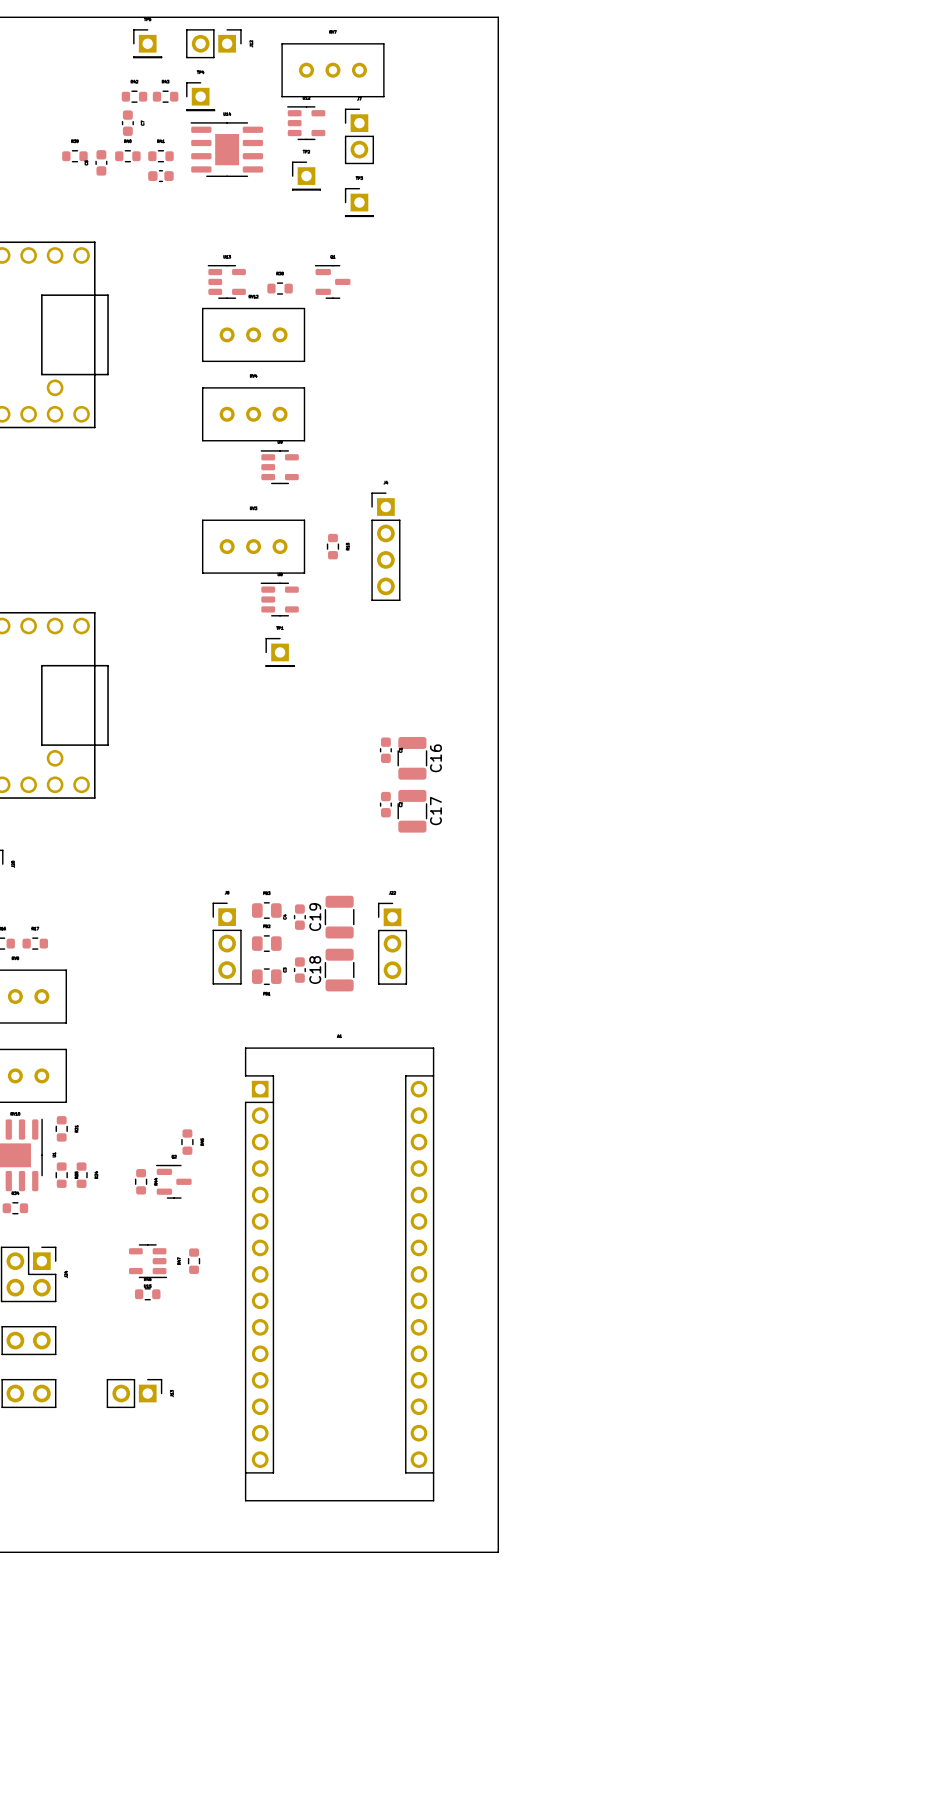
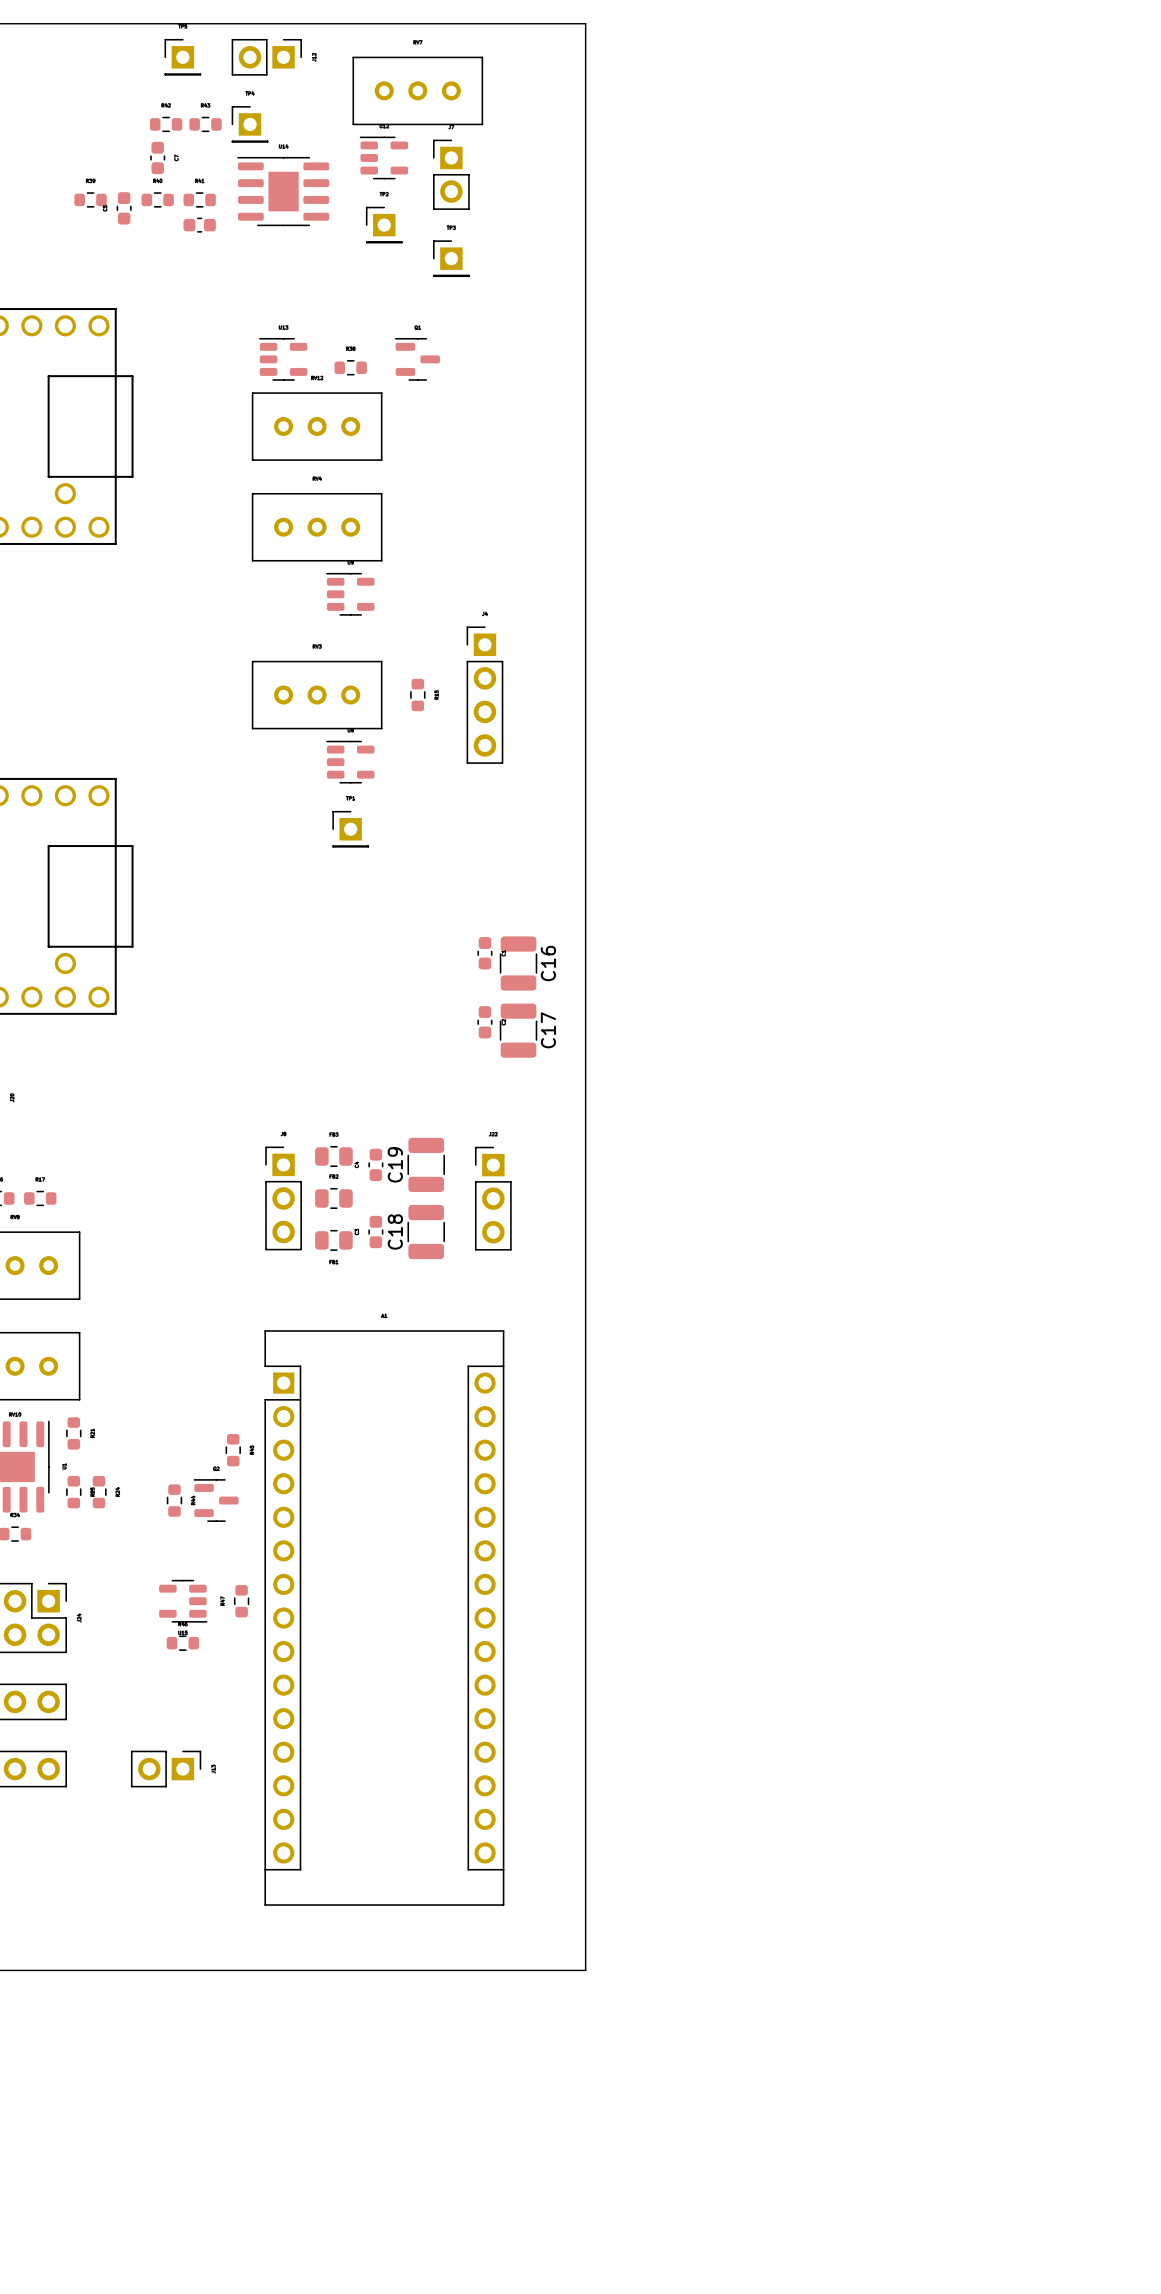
board edge: (465, 17) (498, 17) (498, 1552) (465, 1552) -> (585, 23) (585, 1970)
part position: (339, 1274) -> (384, 1618)

